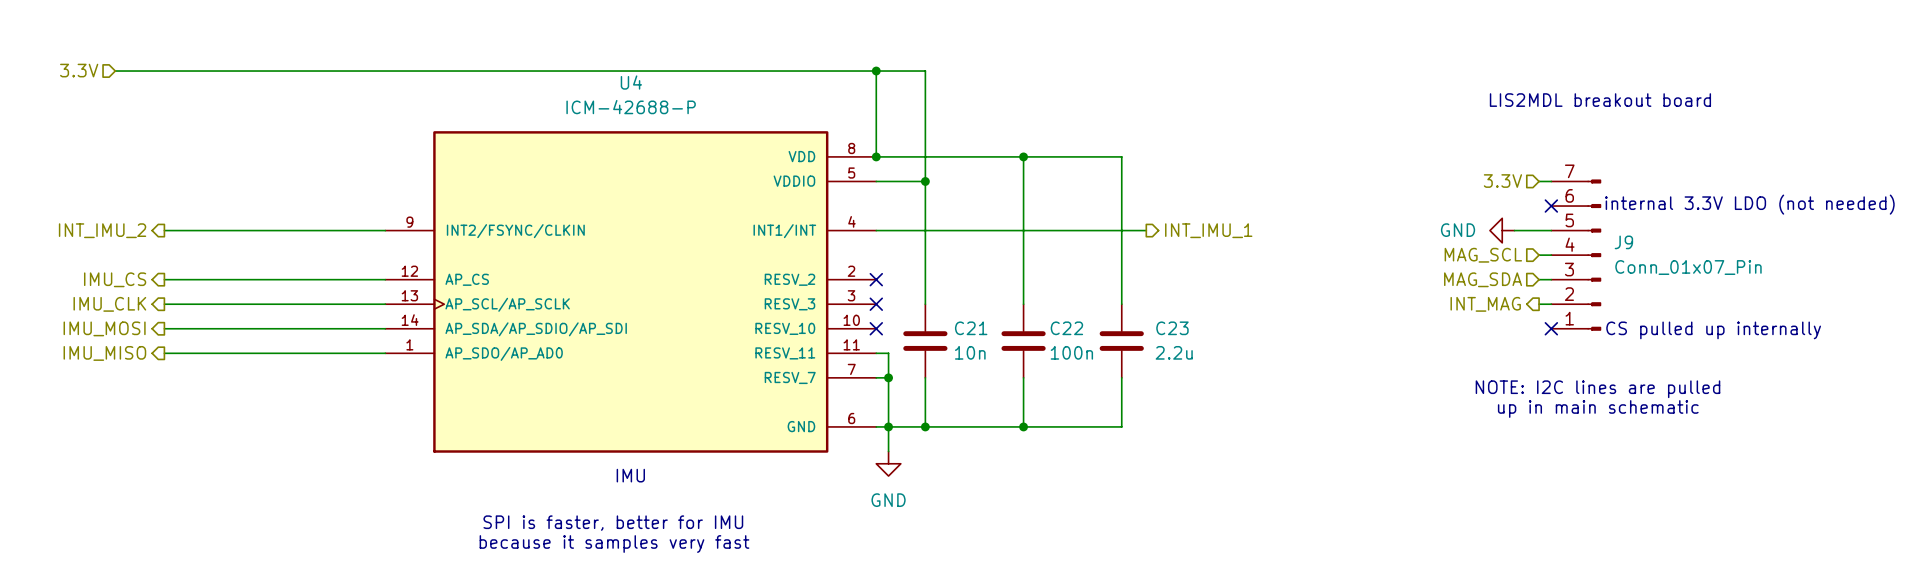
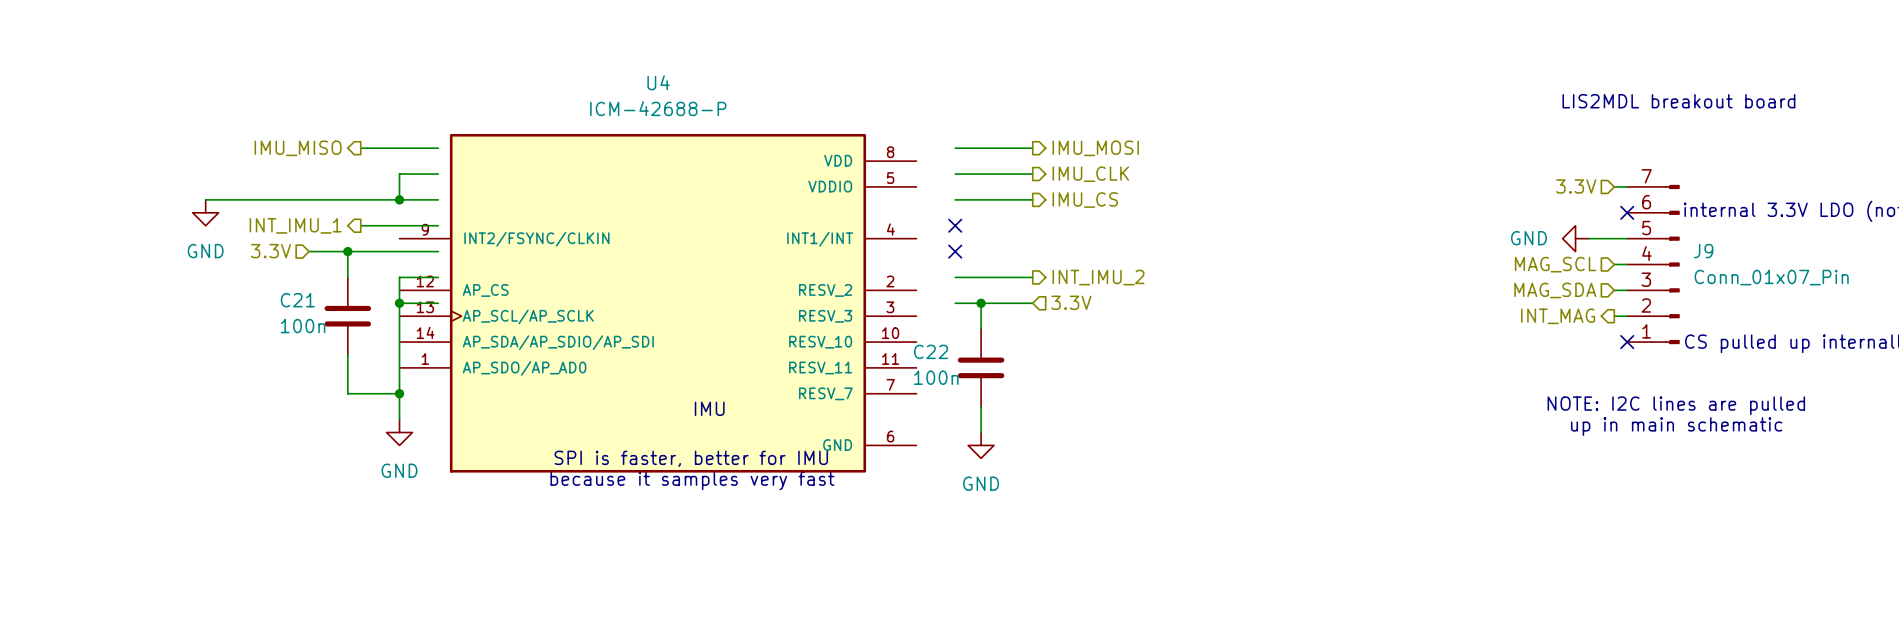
hierarchical label: 3.3V (79, 70) -> none
wire: (115, 71) (925, 71) (925, 304) -> none
wire: (876, 71) (876, 156) (1121, 156) (1121, 304) -> none
junction: (876, 71) -> none
hierarchical label: none -> IMU_MISO (298, 148)
wire: none -> (360, 148) (438, 148)
wire: none -> (955, 148) (1032, 148)
hierarchical label: none -> IMU_MOSI (1095, 148)
junction: (876, 156) -> none
wire: (1023, 156) (1023, 304) -> none
junction: (1023, 156) -> none
wire: none -> (438, 174) (399, 174) (399, 199)
wire: none -> (955, 174) (1032, 174)
hierarchical label: none -> IMU_CLK (1090, 174)
wire: (876, 181) (925, 181) -> none
junction: (925, 181) -> none
junction: none -> (399, 199)
wire: none -> (955, 199) (1032, 199)
hierarchical label: none -> IMU_CS (1085, 200)
power symbol: none -> GND (205, 212)
hierarchical label: none -> INT_IMU_1 (295, 225)
wire: none -> (360, 225) (438, 225)
no-connect mark: none -> (955, 225)
hierarchical label: INT_IMU_2 (102, 230) -> none
wire: (164, 230) (385, 230) -> (205, 199) (438, 199)
wire: (876, 230) (1146, 230) -> none
hierarchical label: INT_IMU_1 (1208, 230) -> none
hierarchical label: none -> 3.3V (271, 251)
wire: none -> (309, 251) (438, 251)
wire: none -> (347, 251) (347, 277)
junction: none -> (347, 251)
no-connect mark: none -> (955, 251)
wire: none -> (438, 277) (399, 277) (399, 419)
wire: none -> (955, 277) (1032, 277)
hierarchical label: none -> INT_IMU_2 (1098, 277)
hierarchical label: IMU_CS (115, 279) -> none
wire: (164, 279) (385, 279) -> none
no-connect mark: (876, 279) -> none
wire: none -> (399, 303) (438, 303)
junction: none -> (399, 303)
wire: none -> (955, 303) (1032, 303)
wire: none -> (981, 303) (981, 329)
junction: none -> (981, 303)
hierarchical label: none -> 3.3V (1071, 302)
hierarchical label: IMU_CLK (109, 304) -> none
wire: (164, 304) (385, 304) -> none
no-connect mark: (876, 304) -> none
hierarchical label: IMU_MOSI (104, 328) -> none
wire: (164, 328) (385, 328) -> none
no-connect mark: (876, 328) -> none
C21 name position: C21 (971, 328) -> C21 (297, 300)
C22 name position: C22 (1066, 328) -> C22 (931, 351)
wire: none -> (347, 354) (347, 393) (399, 393)
C21 position: (925, 341) -> (347, 316)
C22 position: (1023, 341) -> (981, 367)
C23: 2.2u (1121, 341) -> none
C21 value: 10n (970, 352) -> 100n (303, 326)
C22 value position: 100n (1071, 352) -> 100n (936, 377)
hierarchical label: IMU_MISO (104, 353) -> none
wire: (164, 353) (385, 353) -> none
wire: (876, 353) (888, 353) (888, 451) -> none
junction: none -> (399, 393)
wire: (876, 377) (888, 377) -> none
junction: (888, 377) -> none
wire: (925, 377) (925, 426) -> none
wire: (1023, 377) (1023, 426) -> none
wire: (1121, 377) (1121, 426) (876, 426) -> none
wire: none -> (981, 406) (981, 432)
power symbol: none -> GND (399, 432)
junction: (888, 426) -> none
junction: (925, 426) -> none
junction: (1023, 426) -> none
power symbol position: GND (888, 463) -> GND (981, 445)
text position: IMU (630, 475) -> IMU (709, 408)
text position: SPI is faster, better for IMU (613, 523) -> SPI is faster, better for IMU (691, 458)
text position: because it samples very fast (614, 544) -> because it samples very fast (692, 480)

